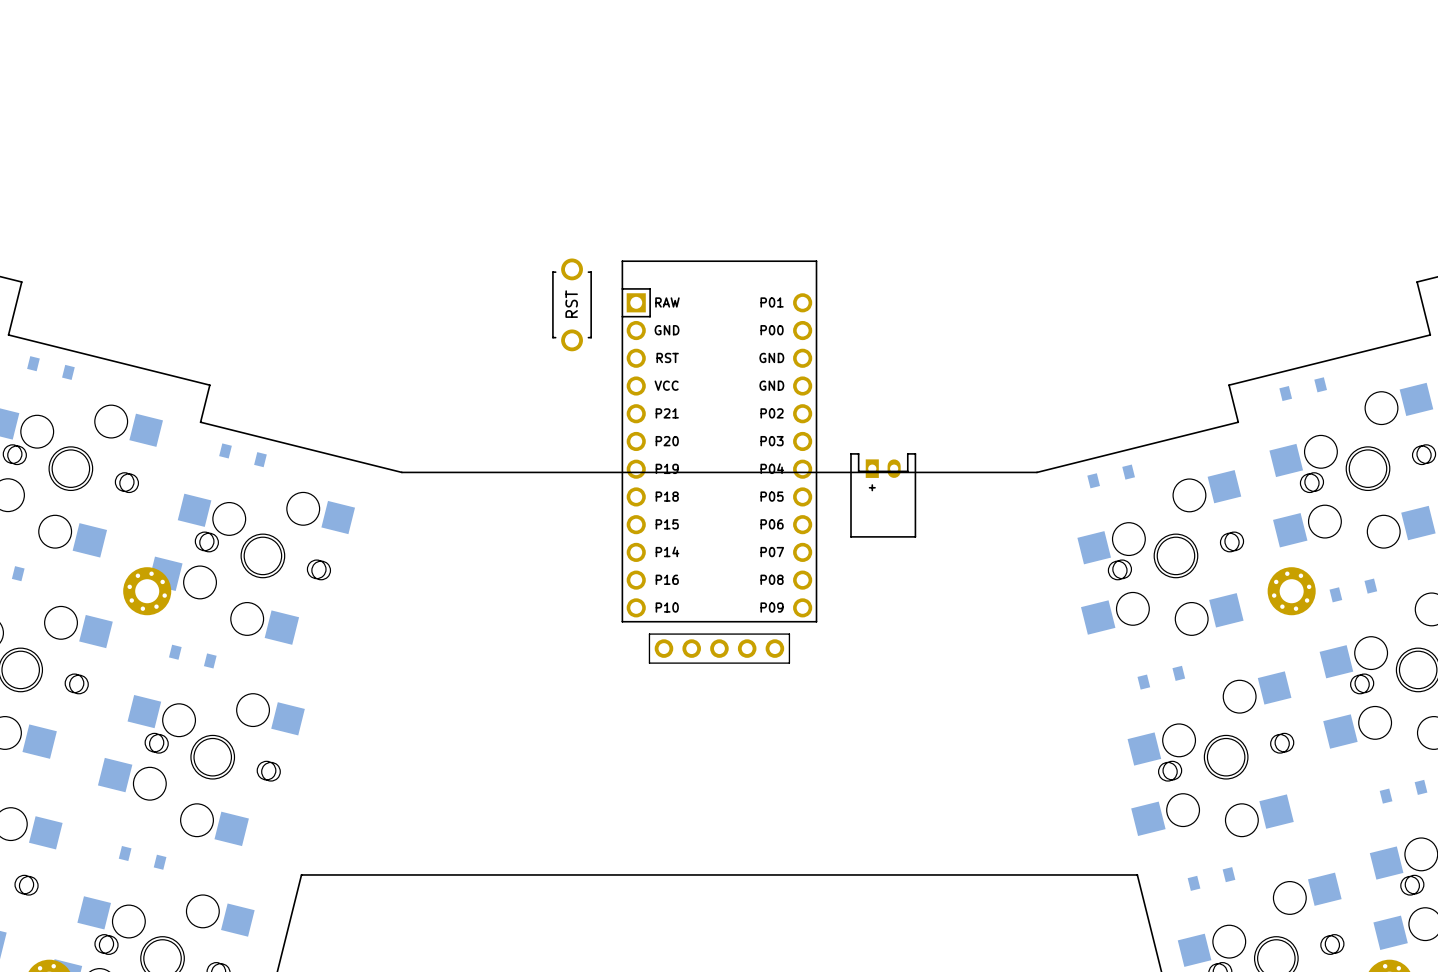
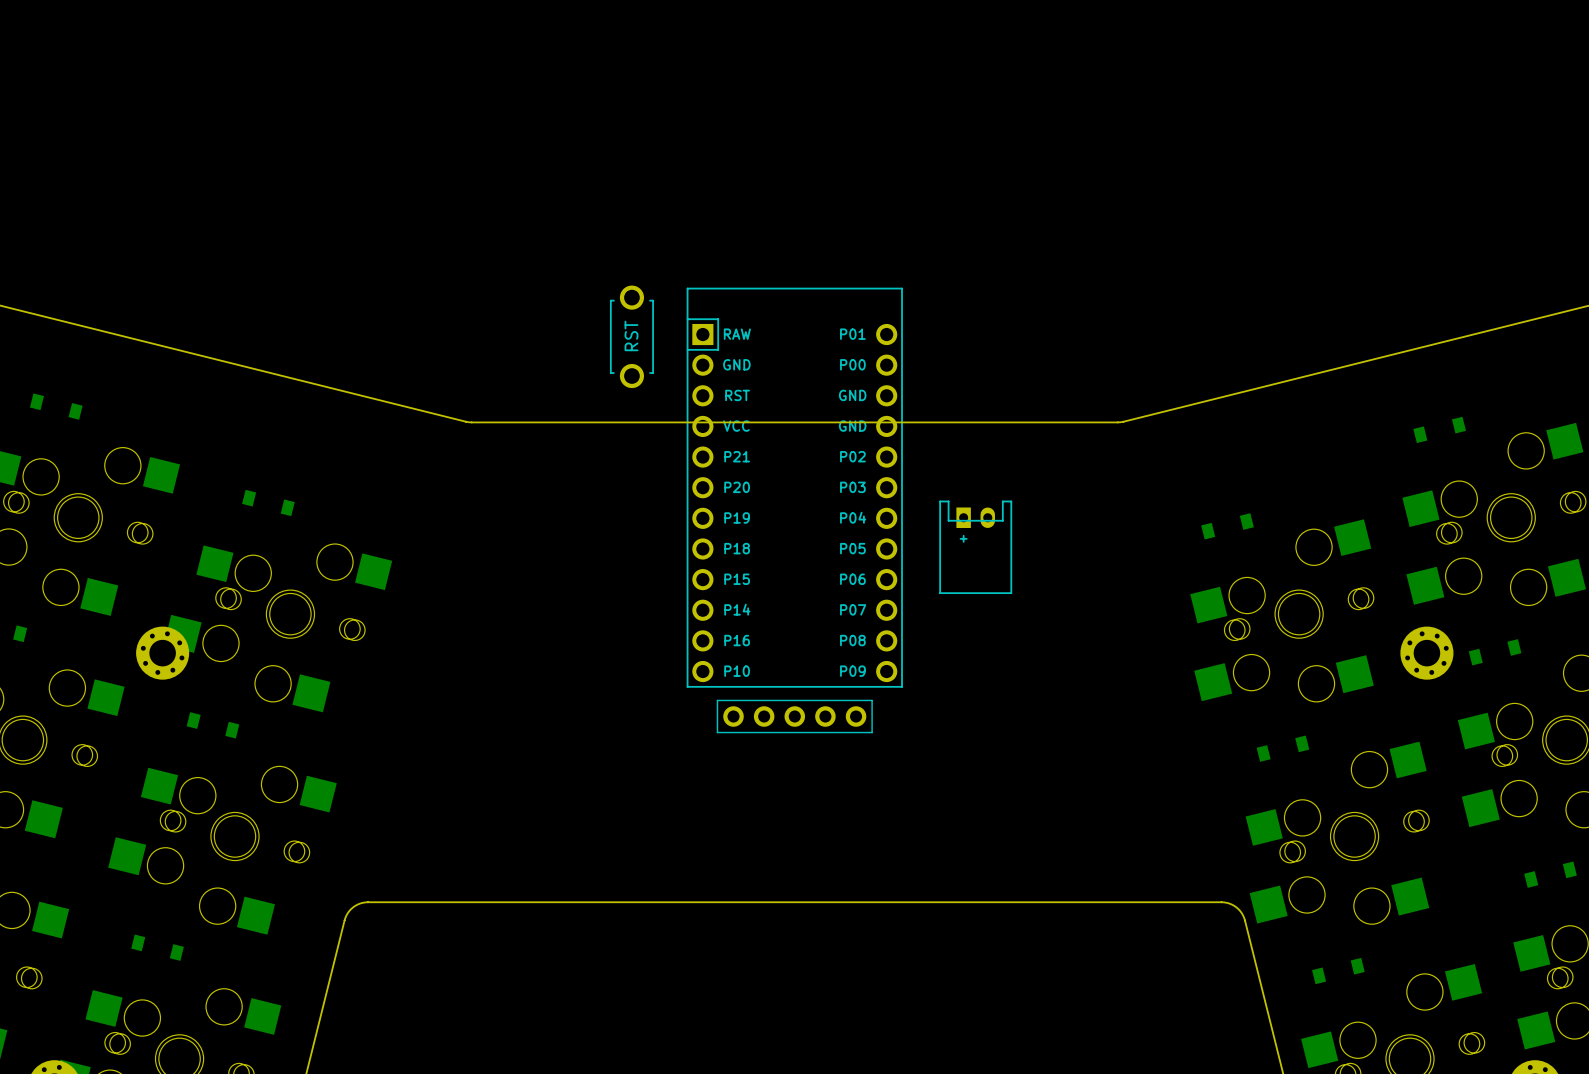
board edge: (21, 282) (8, 334) (209, 385) (200, 422) (401, 472) (1037, 472) (1238, 422) (1229, 385) (1430, 334) (1417, 282) -> (24, 311) (468, 422) (1117, 422) (1565, 311)
board edge: (301, 874) (1137, 874) -> (333, 966) (346, 915) (355, 905) (367, 902) (1224, 902) (1236, 907) (1243, 915) (1256, 966)

